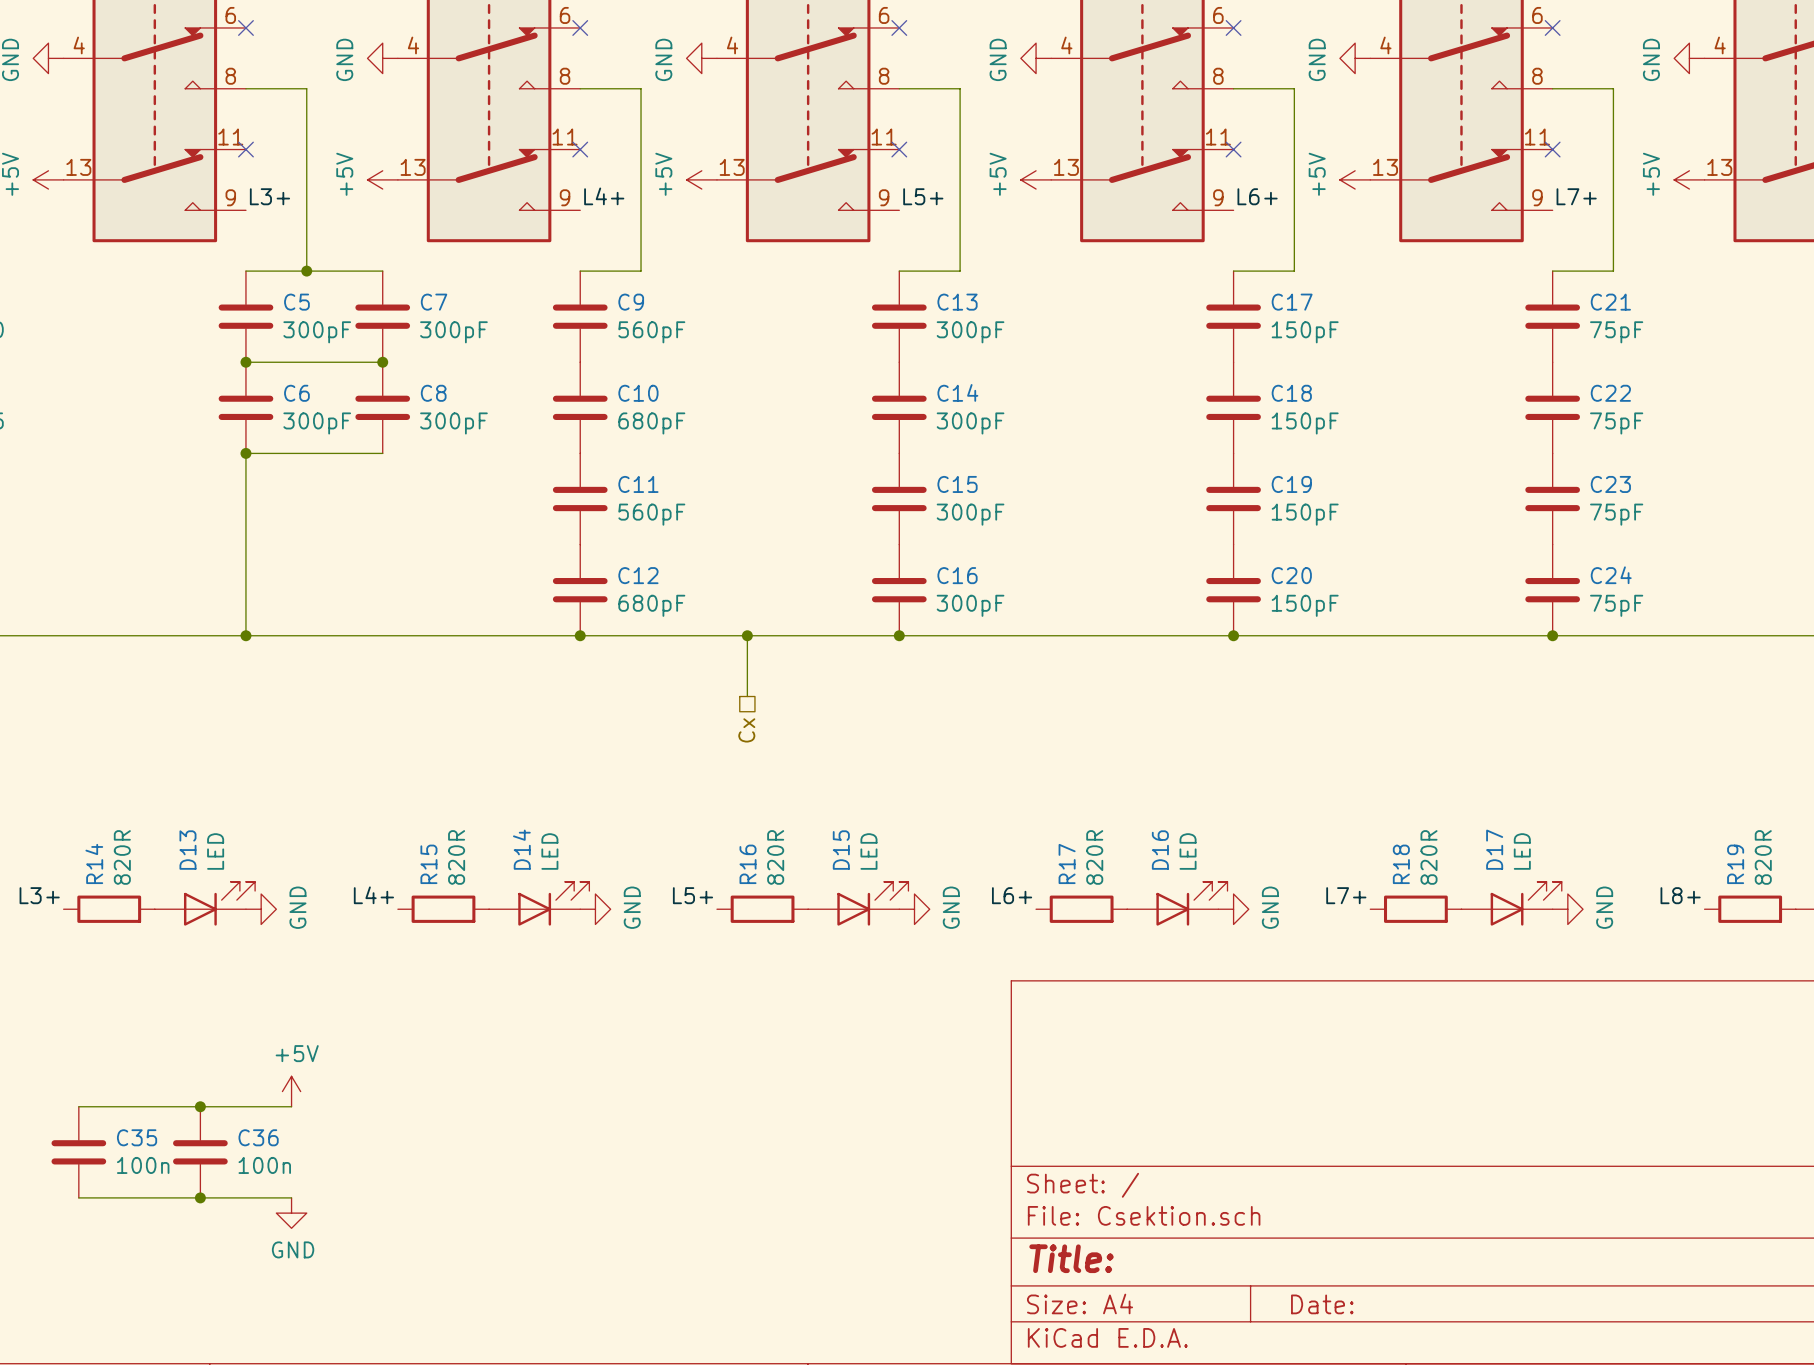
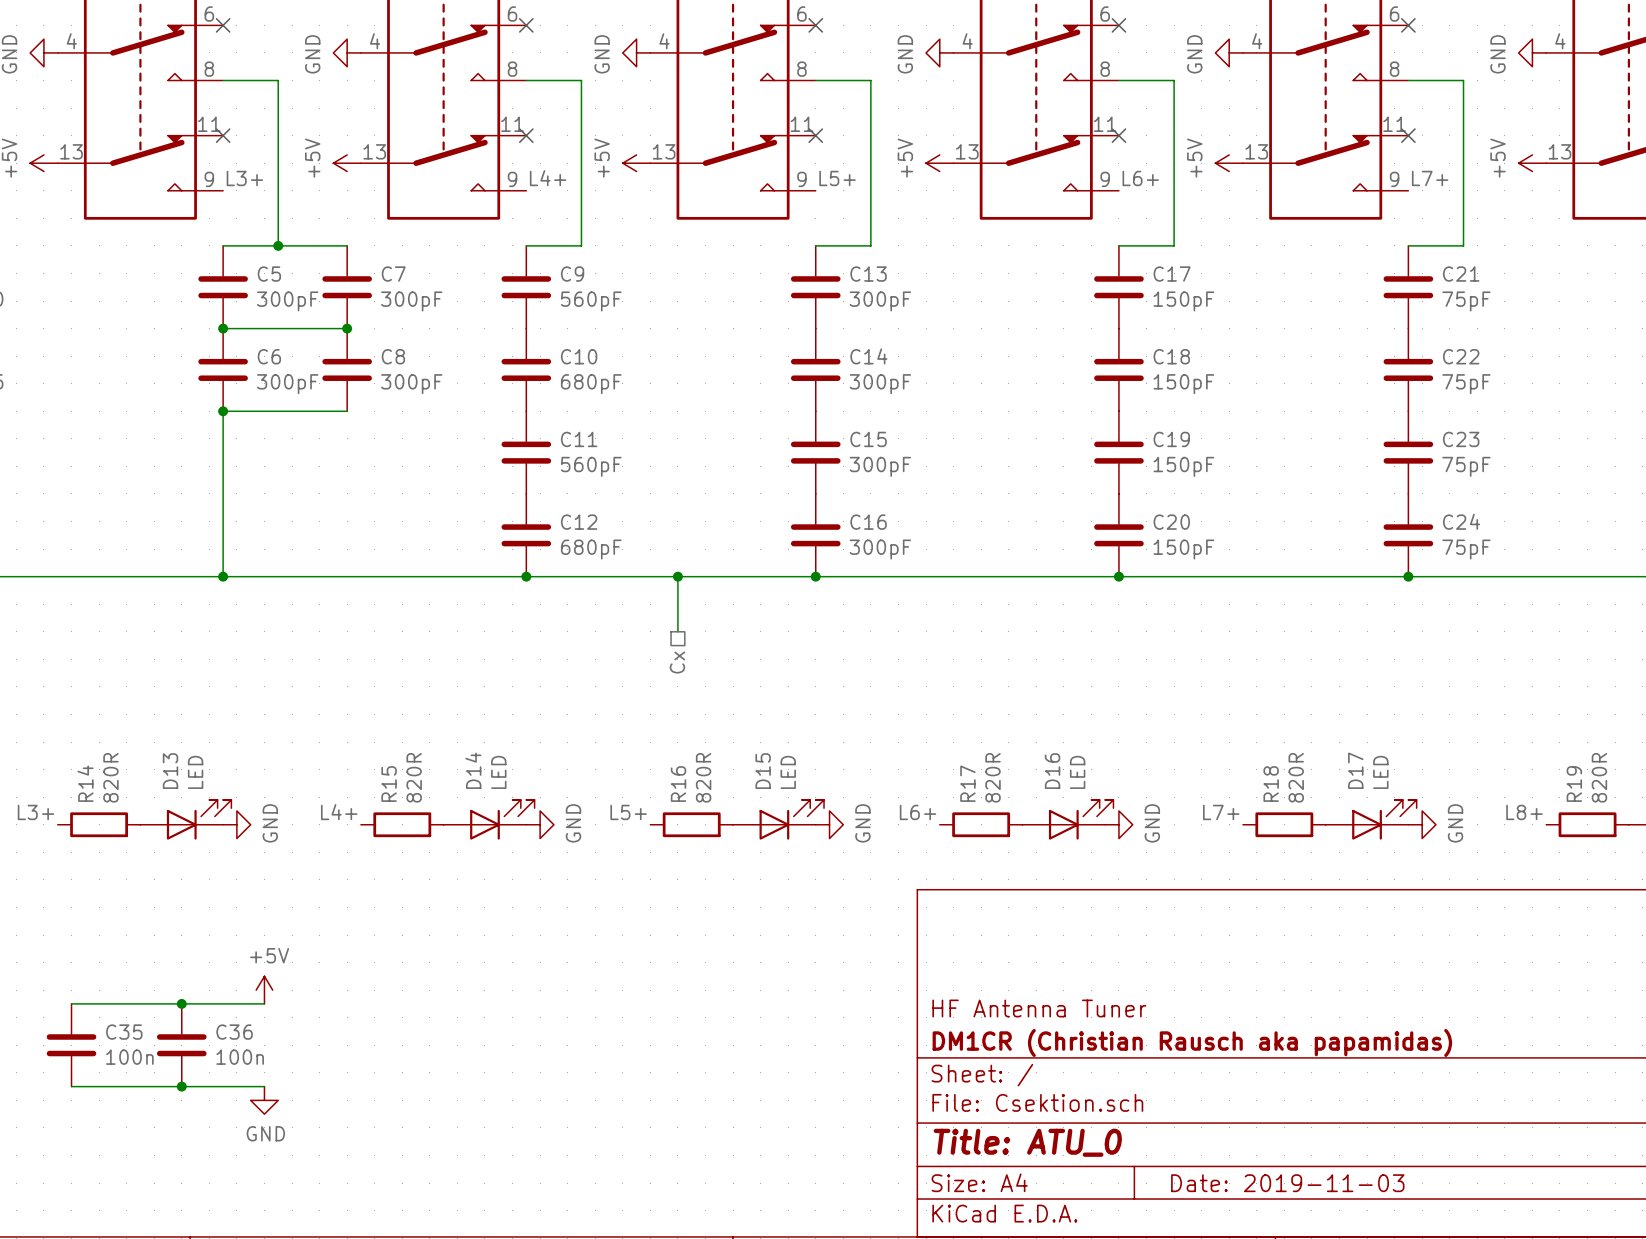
title block: none -> HF Antenna Tuner (1039, 1008)
title block: none -> DM1CR (Christian Rausch aka papamidas) (1192, 1042)
title block: Title: (1071, 1258) -> Title: ATU_0 (1027, 1142)
title block: Date: (1322, 1304) -> Date: 2019-11-03 (1287, 1183)

